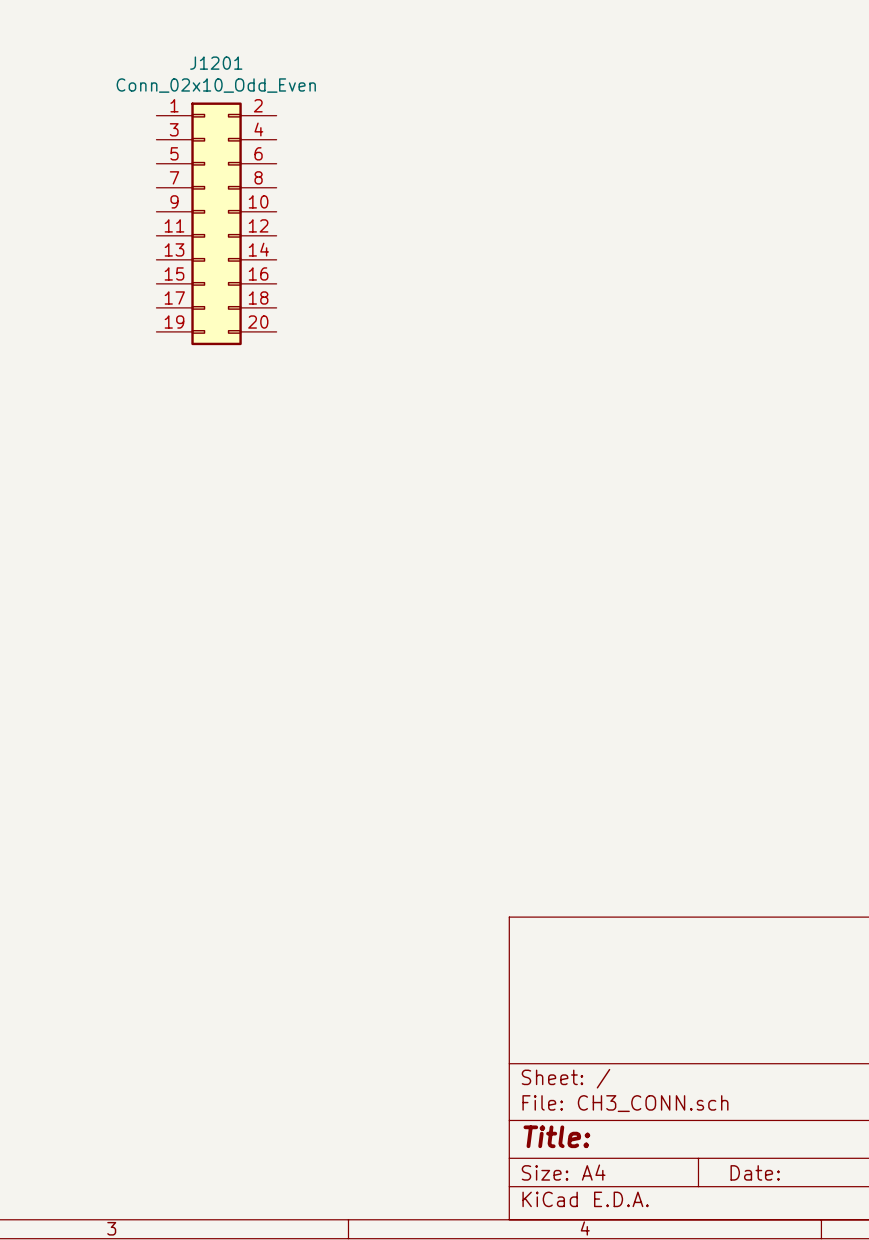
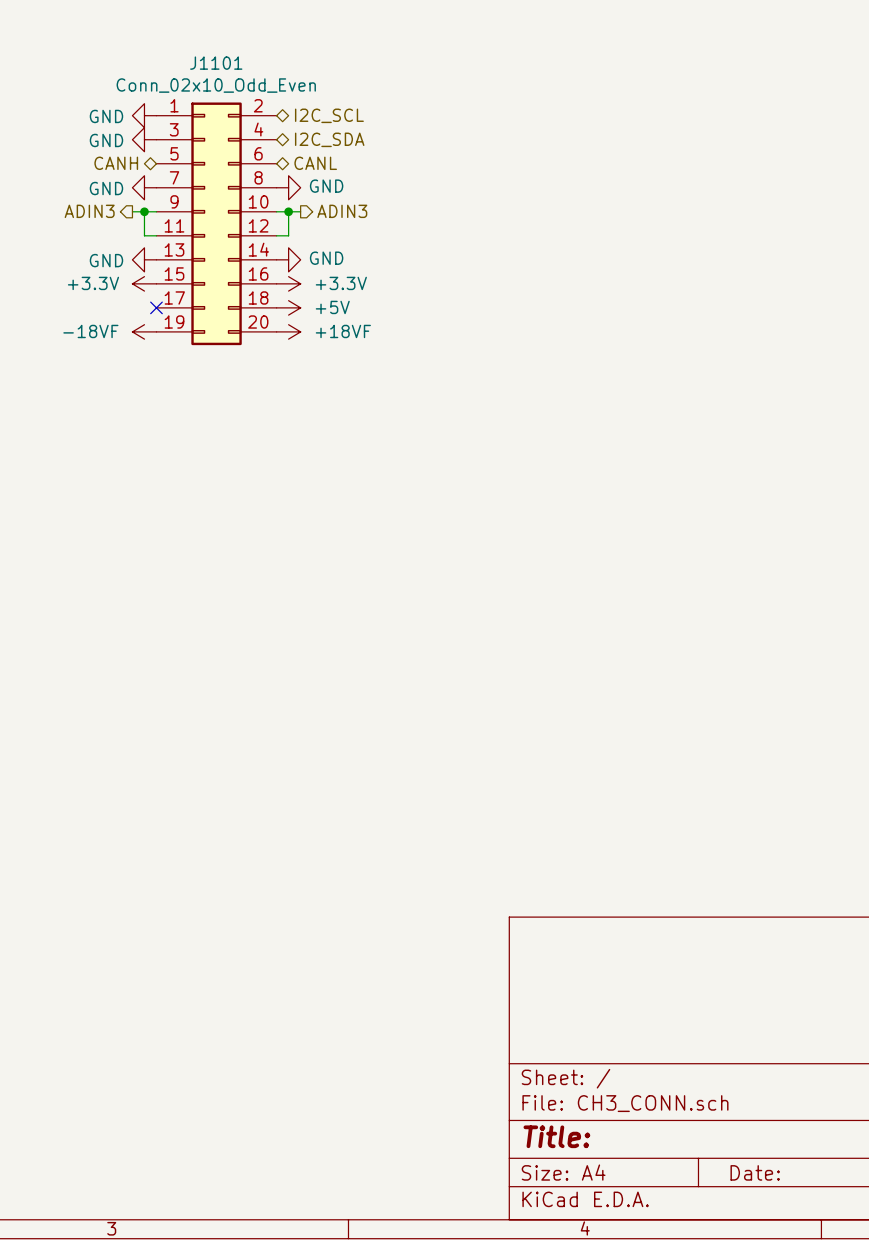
J1201 name: J1201 (216, 63) -> J1101 (216, 63)
power symbol: none -> GND (144, 115)
hierarchical label: none -> I2C_SCL (329, 115)
power symbol: none -> GND (144, 139)
hierarchical label: none -> I2C_SDA (329, 139)
hierarchical label: none -> CANH (116, 163)
hierarchical label: none -> CANL (315, 163)
power symbol: none -> GND (144, 187)
power symbol: none -> GND (288, 187)
hierarchical label: none -> ADIN3 (89, 211)
wire: none -> (132, 211) (156, 211)
wire: none -> (144, 211) (144, 235) (156, 235)
junction: none -> (144, 211)
wire: none -> (276, 211) (300, 211)
wire: none -> (288, 211) (288, 235) (276, 235)
junction: none -> (288, 211)
hierarchical label: none -> ADIN3 (342, 211)
power symbol: none -> GND (144, 259)
power symbol: none -> GND (288, 259)
power symbol: none -> +3.3V (144, 283)
power symbol: none -> +3.3V (288, 283)
no-connect mark: none -> (156, 307)
power symbol: none -> +5V (288, 307)
power symbol: none -> -18VF (144, 331)
power symbol: none -> +18VF (288, 331)

